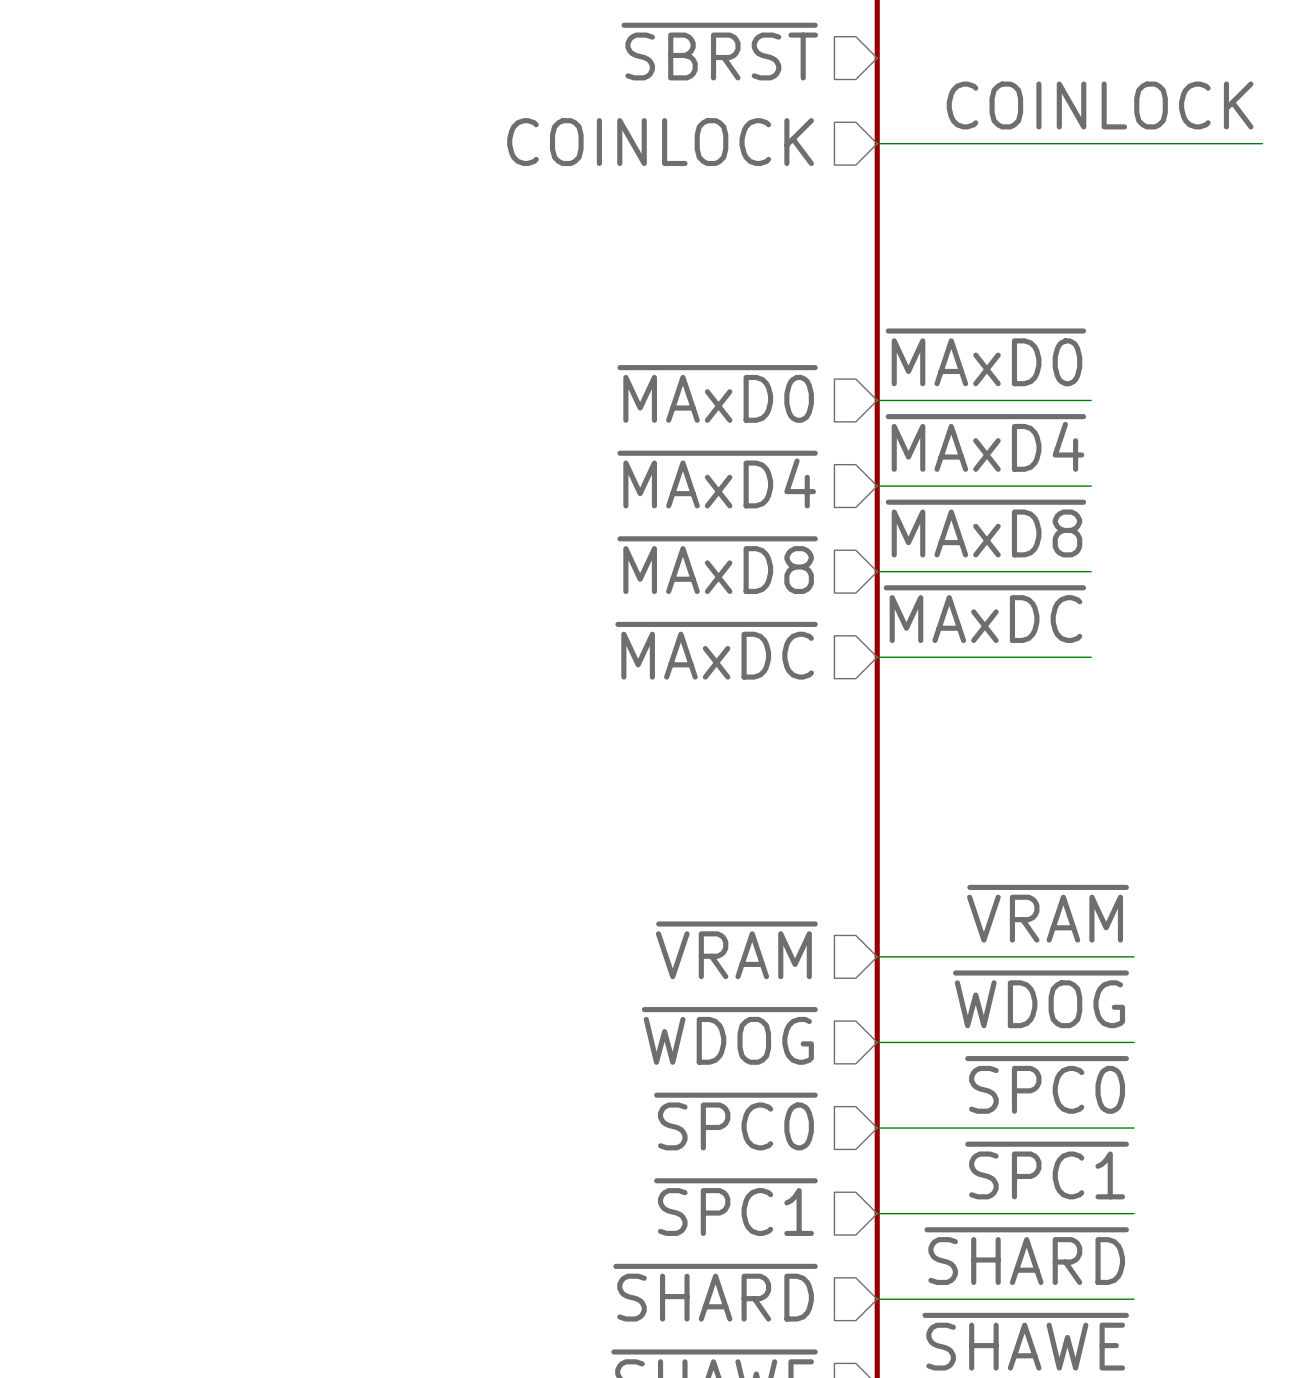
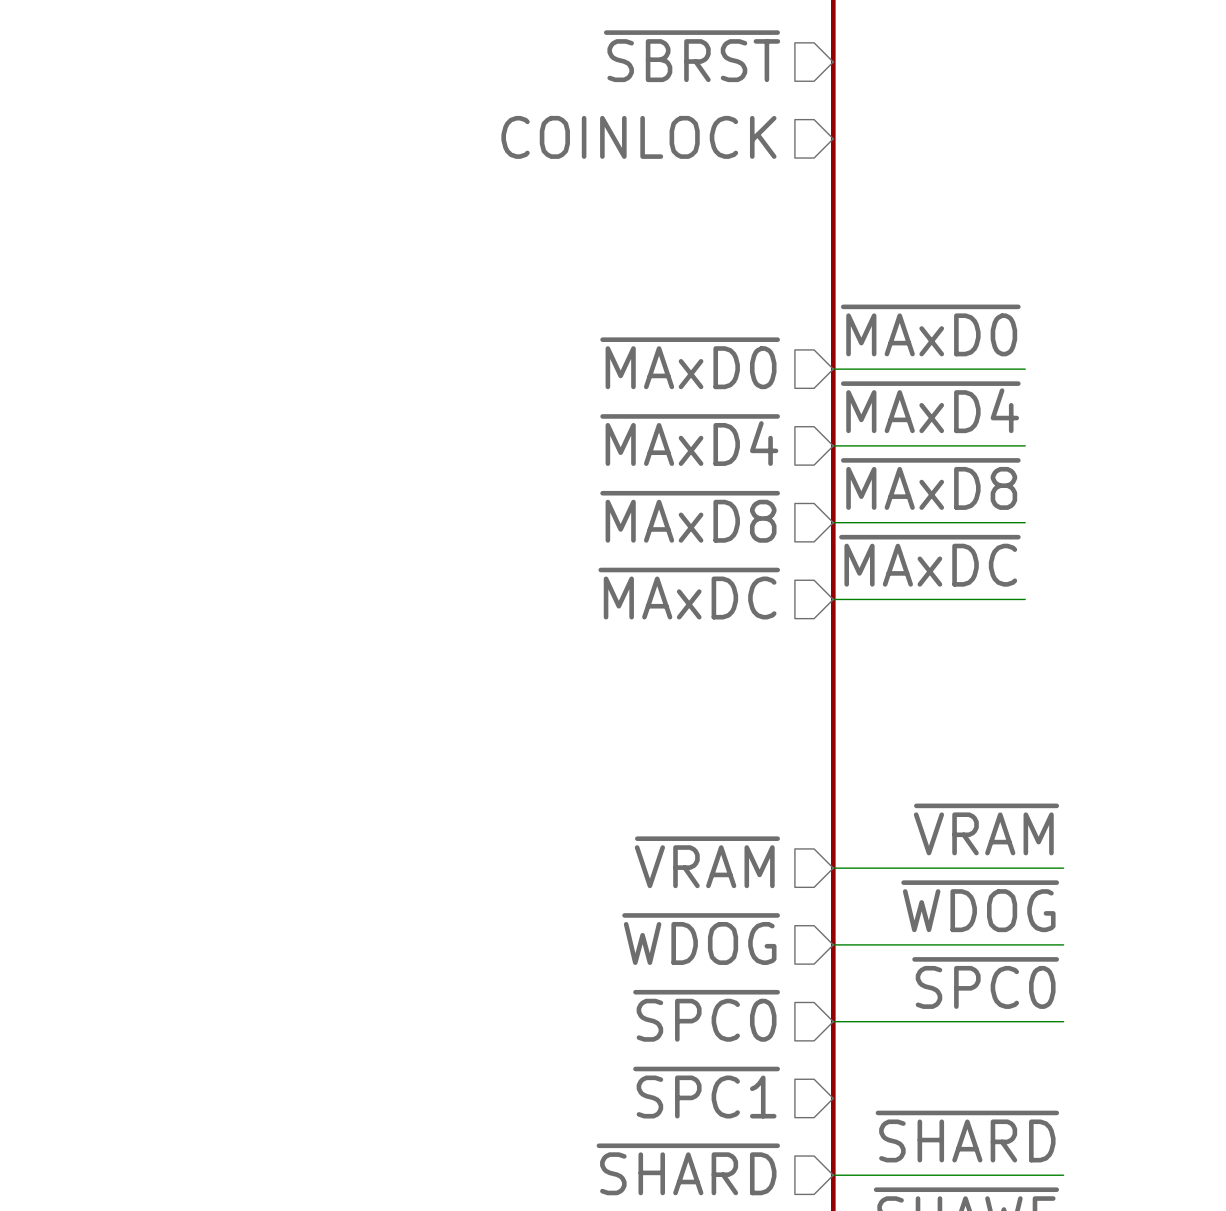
label: COINLOCK (1100, 105) -> none
wire: (877, 143) (1262, 143) -> none
label: ~{SPC1} (1047, 1170) -> none
wire: (877, 1213) (1134, 1213) -> none

